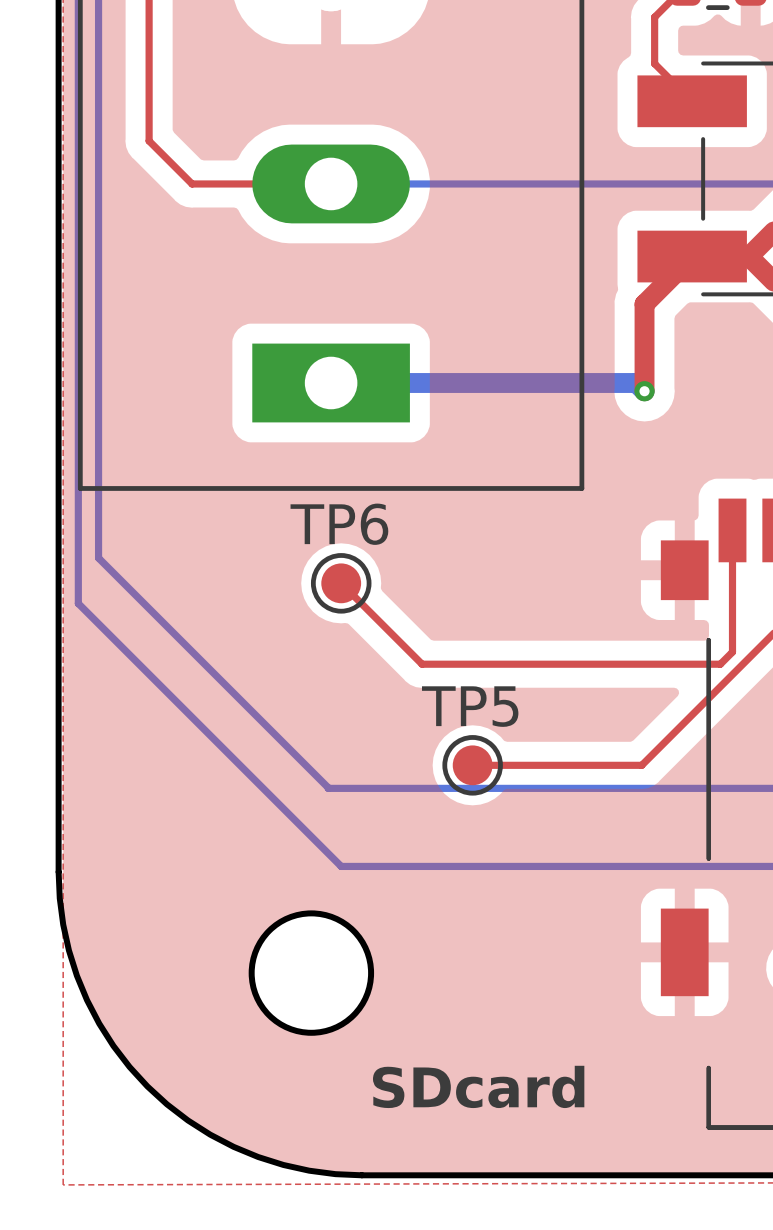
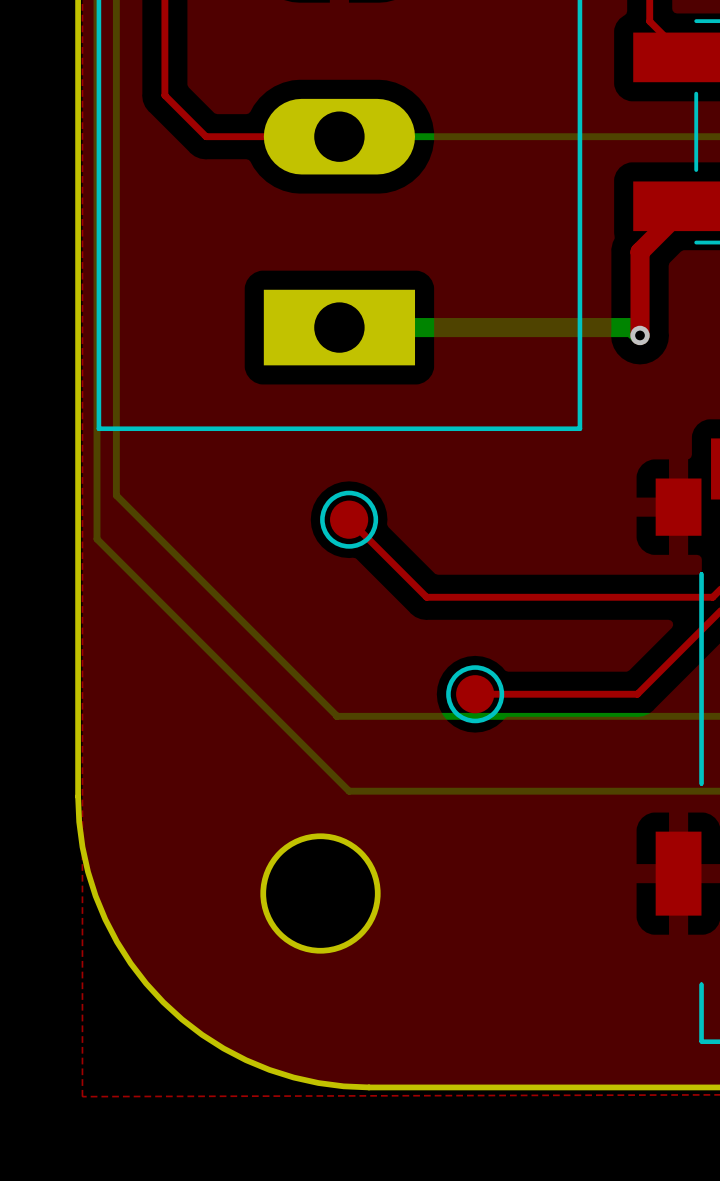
TP6 name: TP6 (339, 524) -> none
TP5 name: TP5 (470, 706) -> none
text: SDcard (478, 1086) -> none

